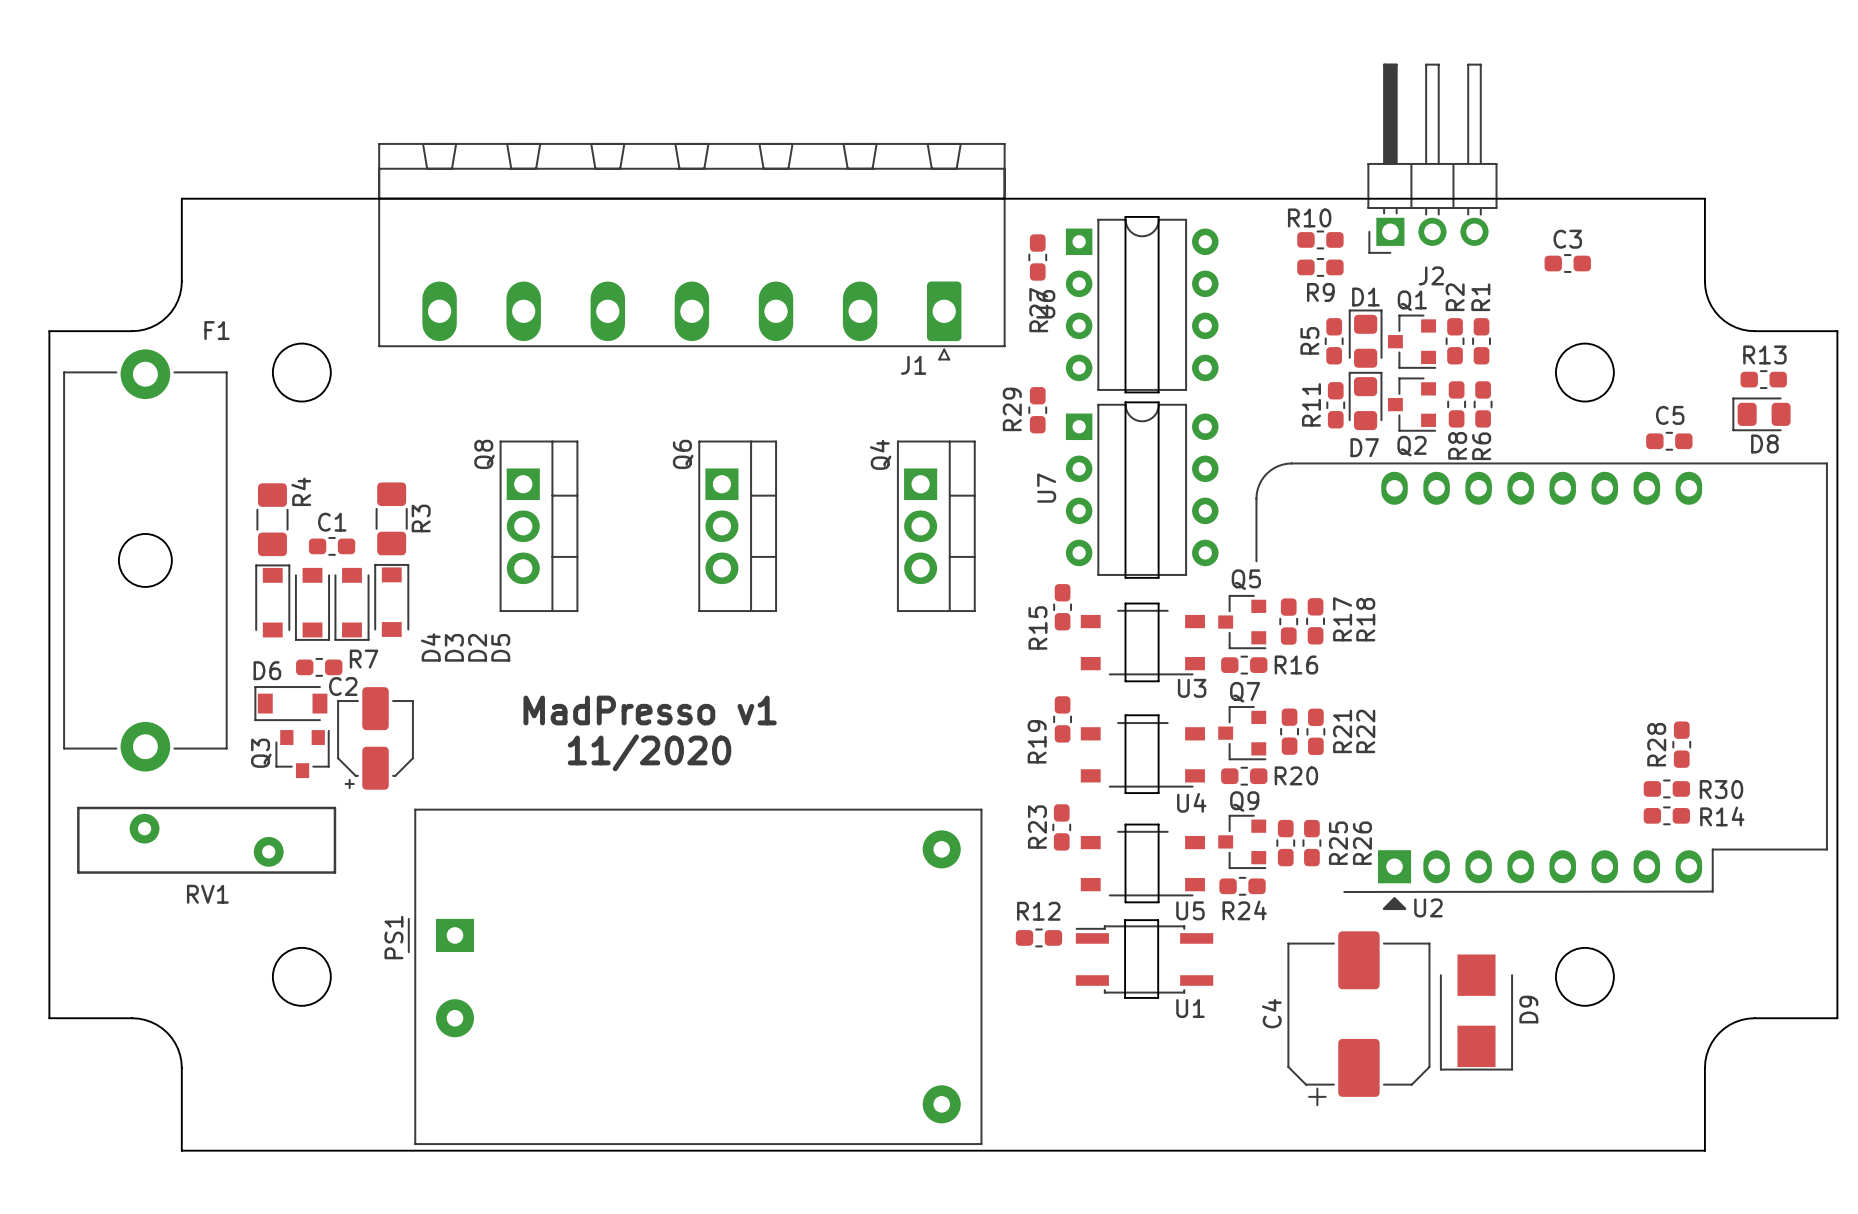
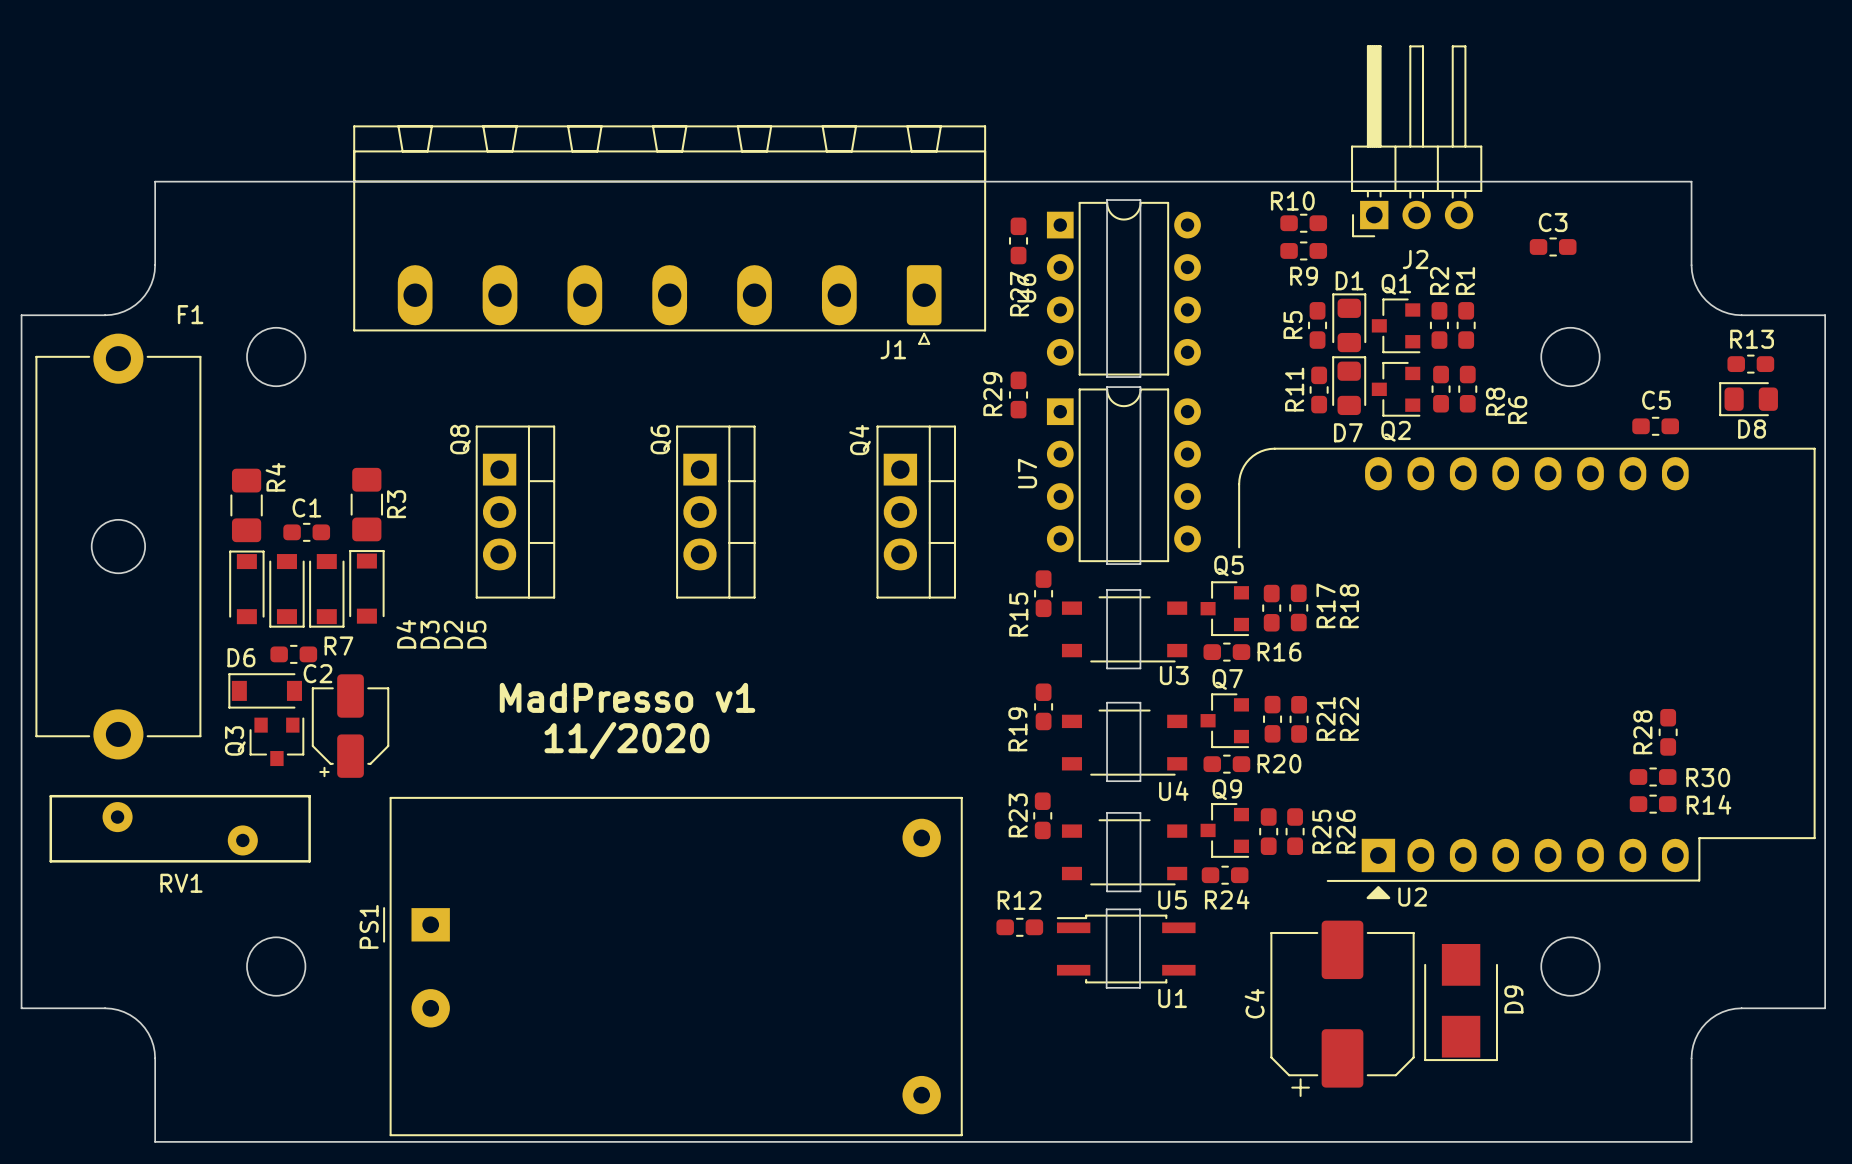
R8 name position: R8 (1457, 445) -> R8 (1495, 401)
R6 name position: R6 (1481, 446) -> R6 (1517, 410)

